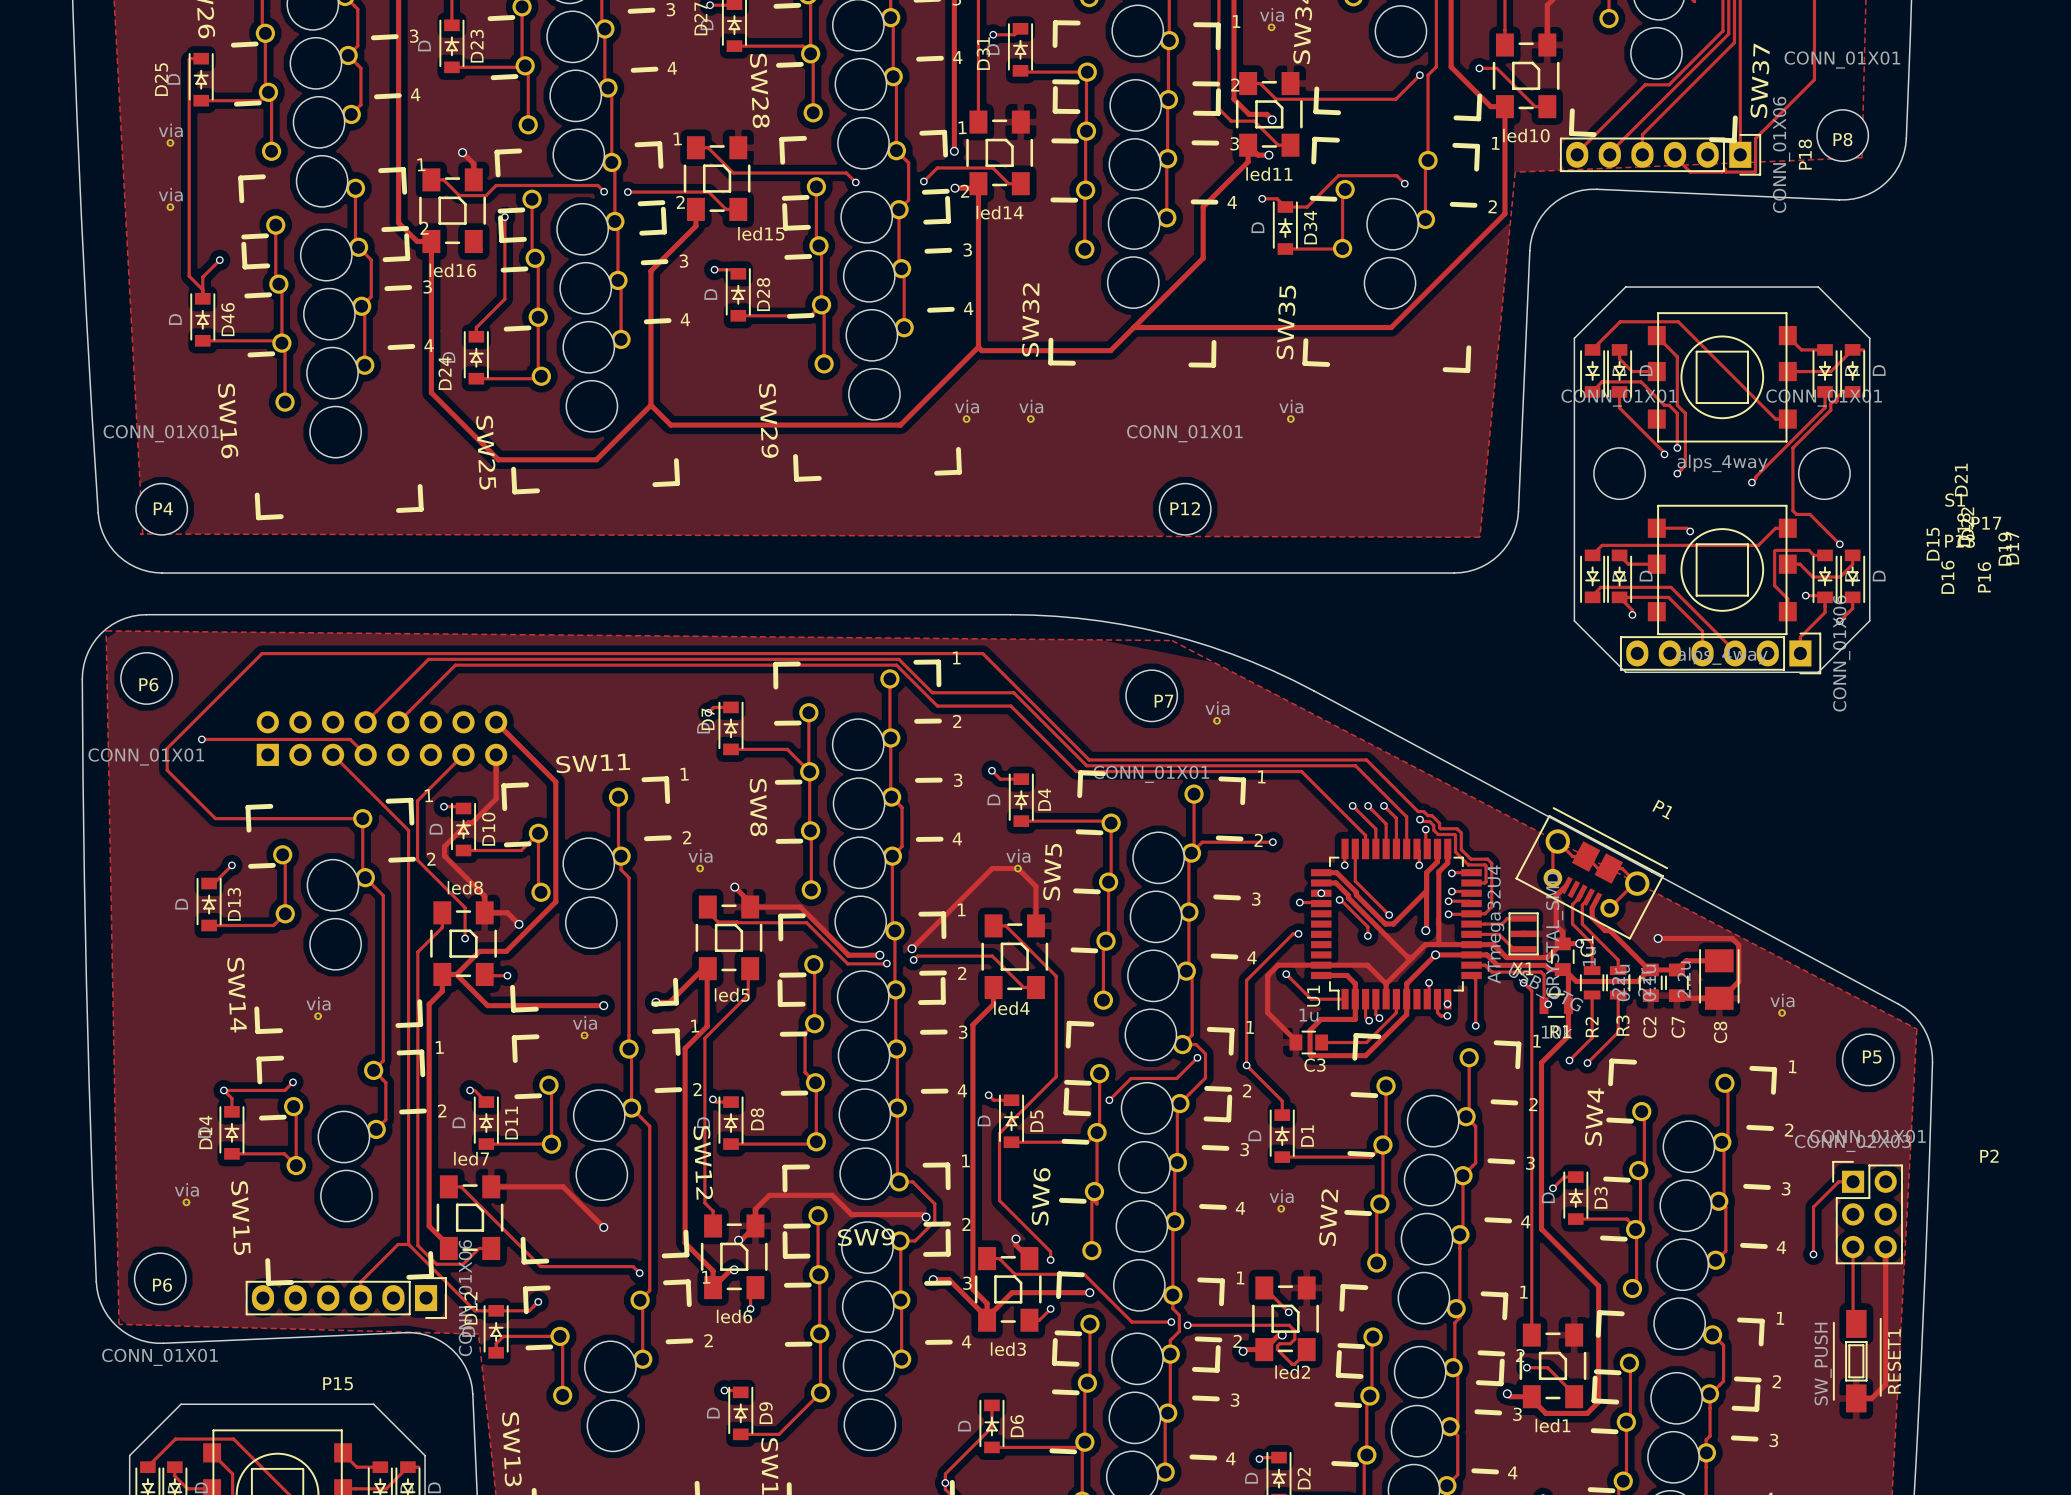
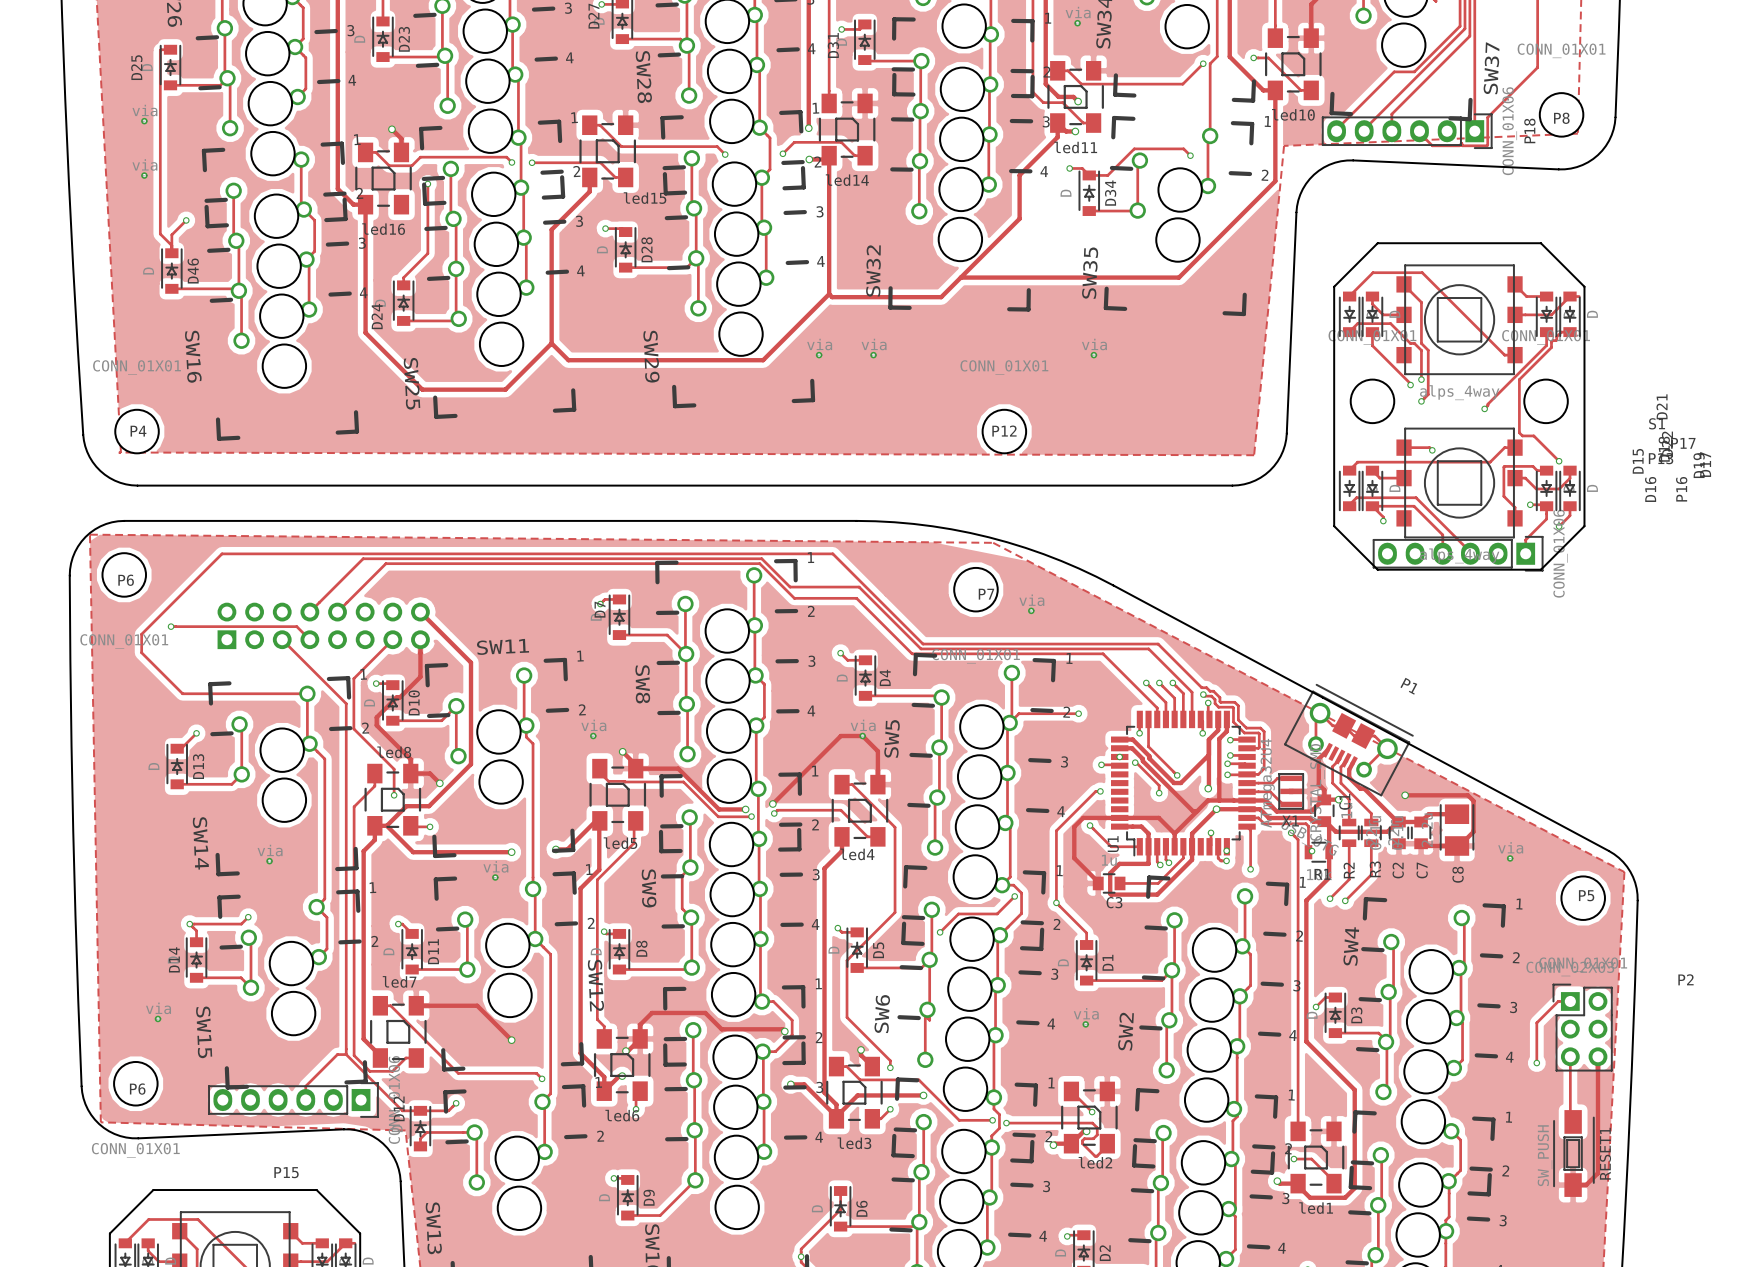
SW9 name rotation: 0° (866, 1237) -> 90° clockwise (649, 888)
SW9 name position: SW9 (866, 1237) -> SW9 (649, 888)

